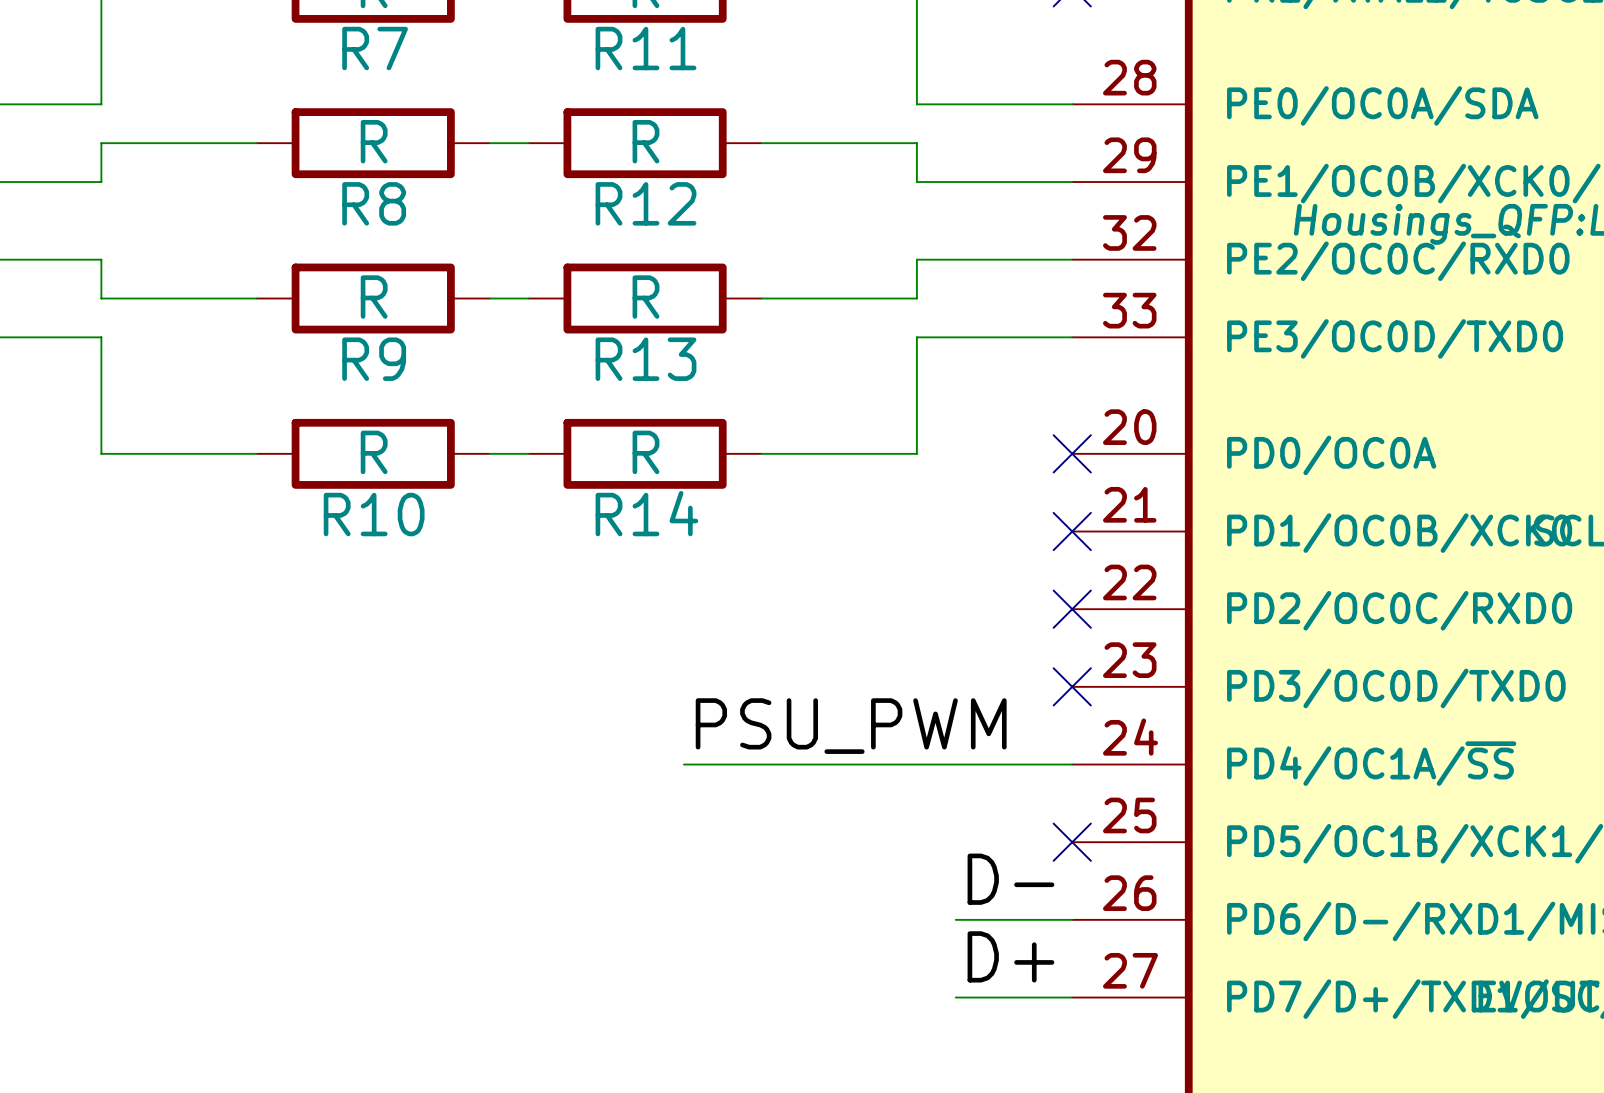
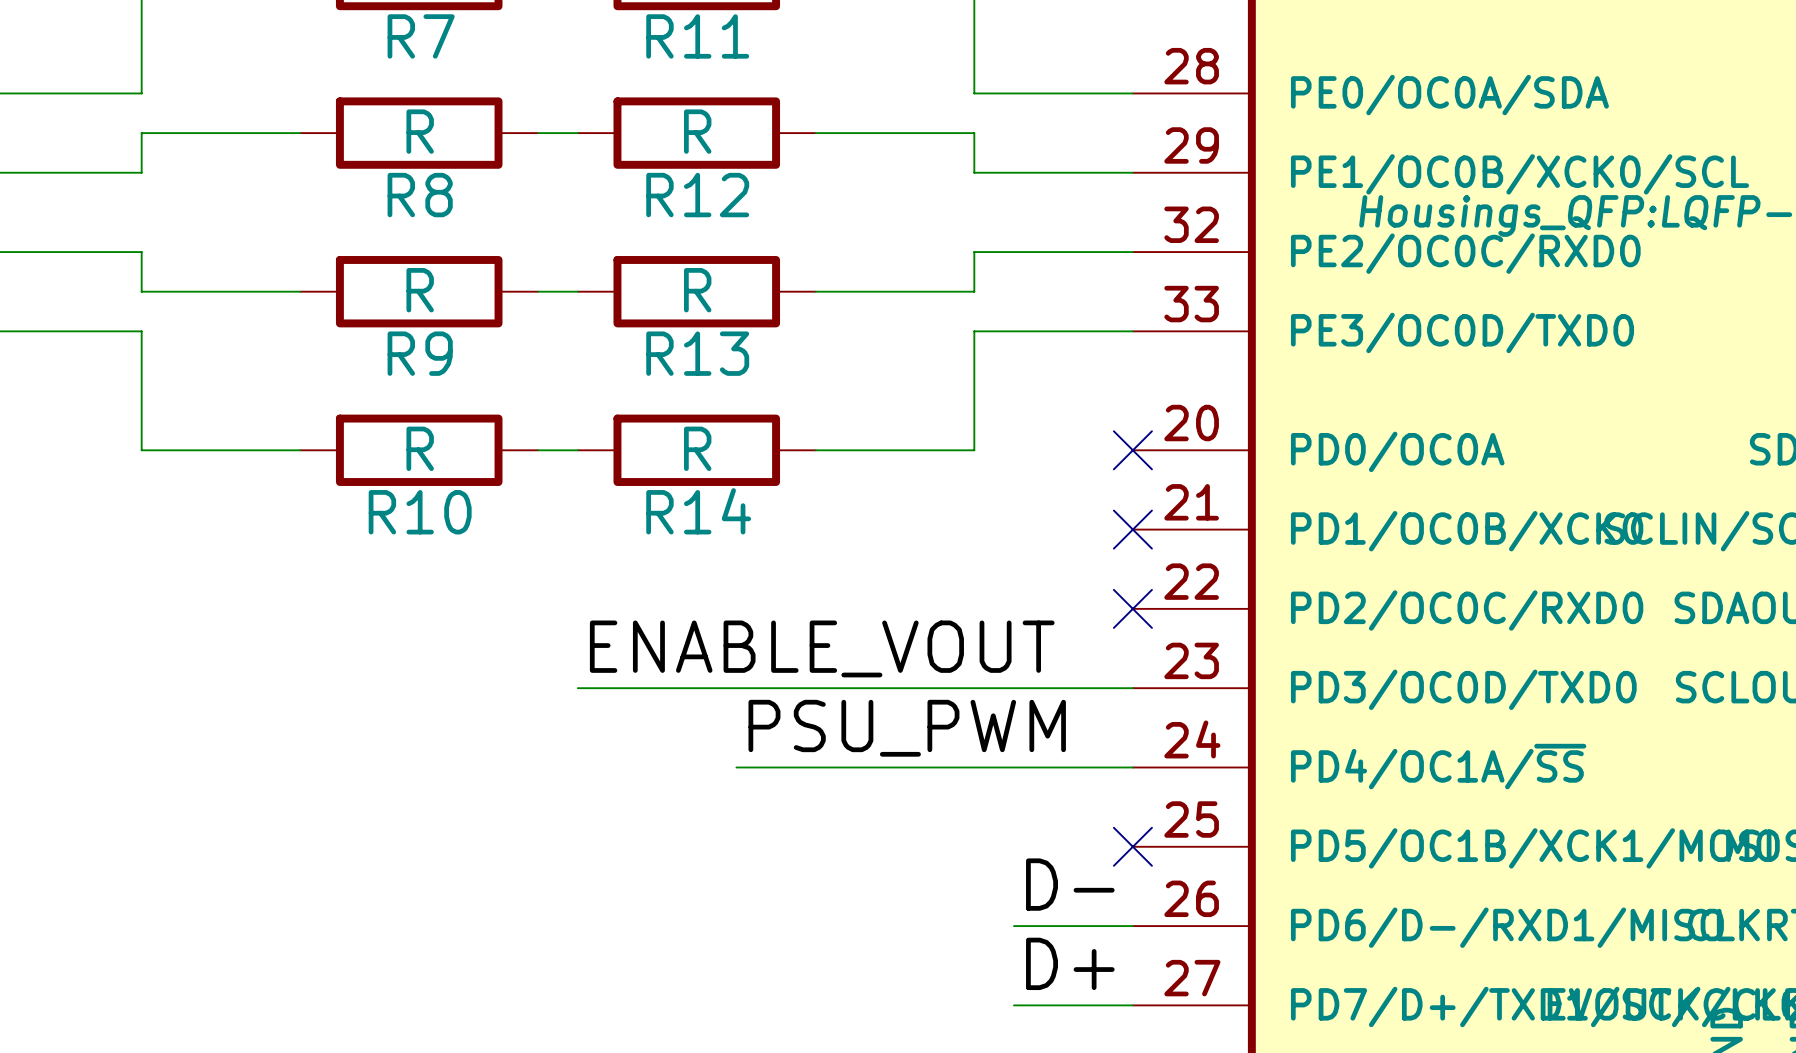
label: none -> ENABLE_VOUT (822, 648)
wire: none -> (577, 688) (1132, 688)
no-connect mark: (1072, 686) -> none

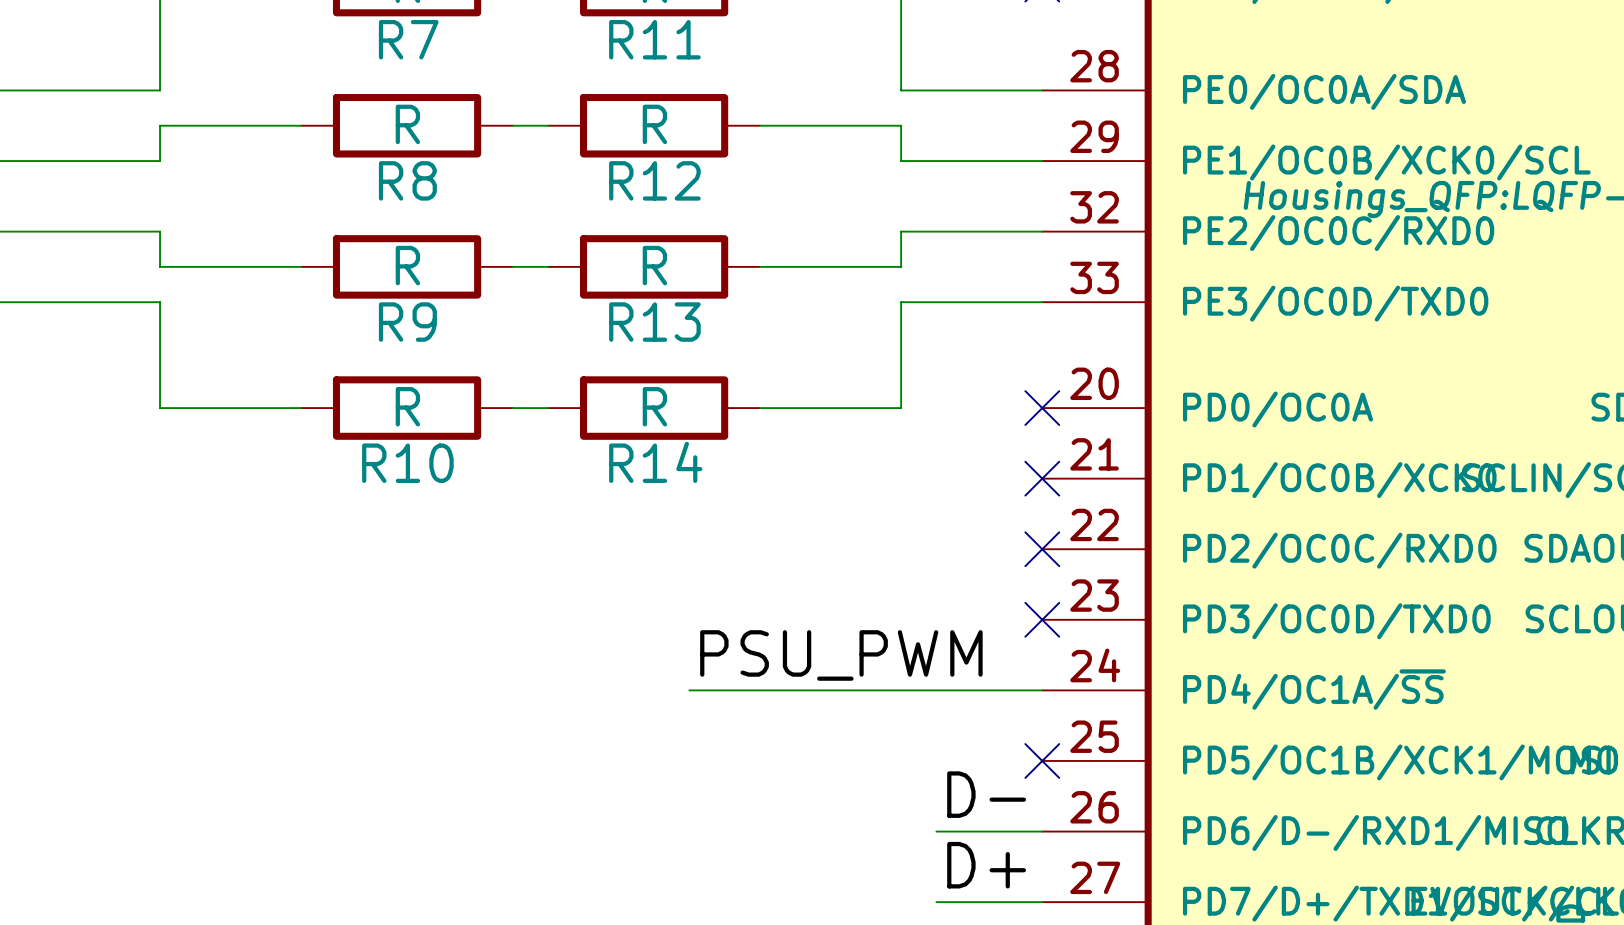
label: ENABLE_VOUT (822, 648) -> none
wire: (577, 688) (1132, 688) -> none
no-connect mark: none -> (1042, 619)

